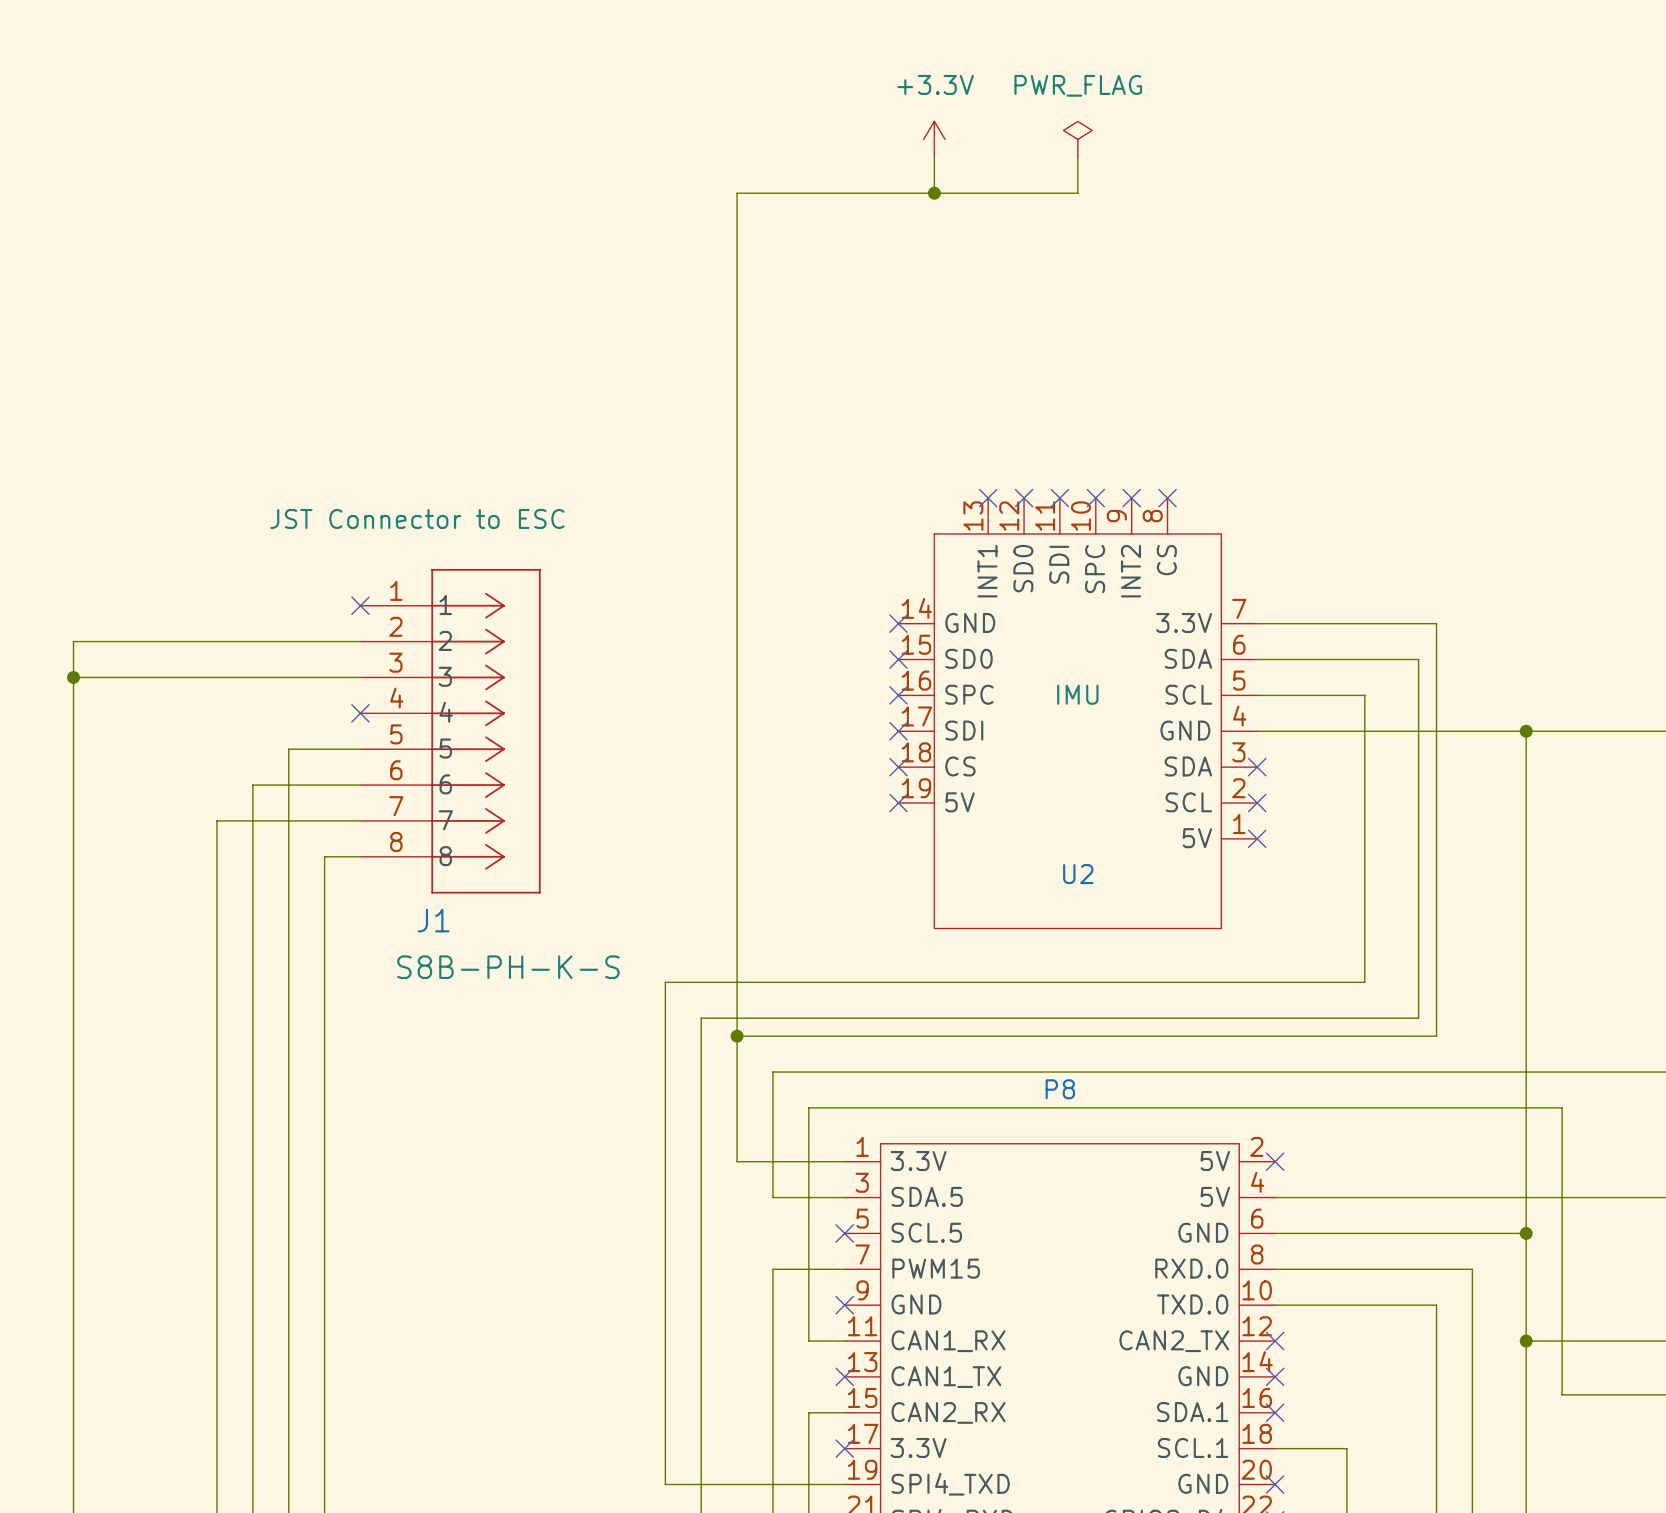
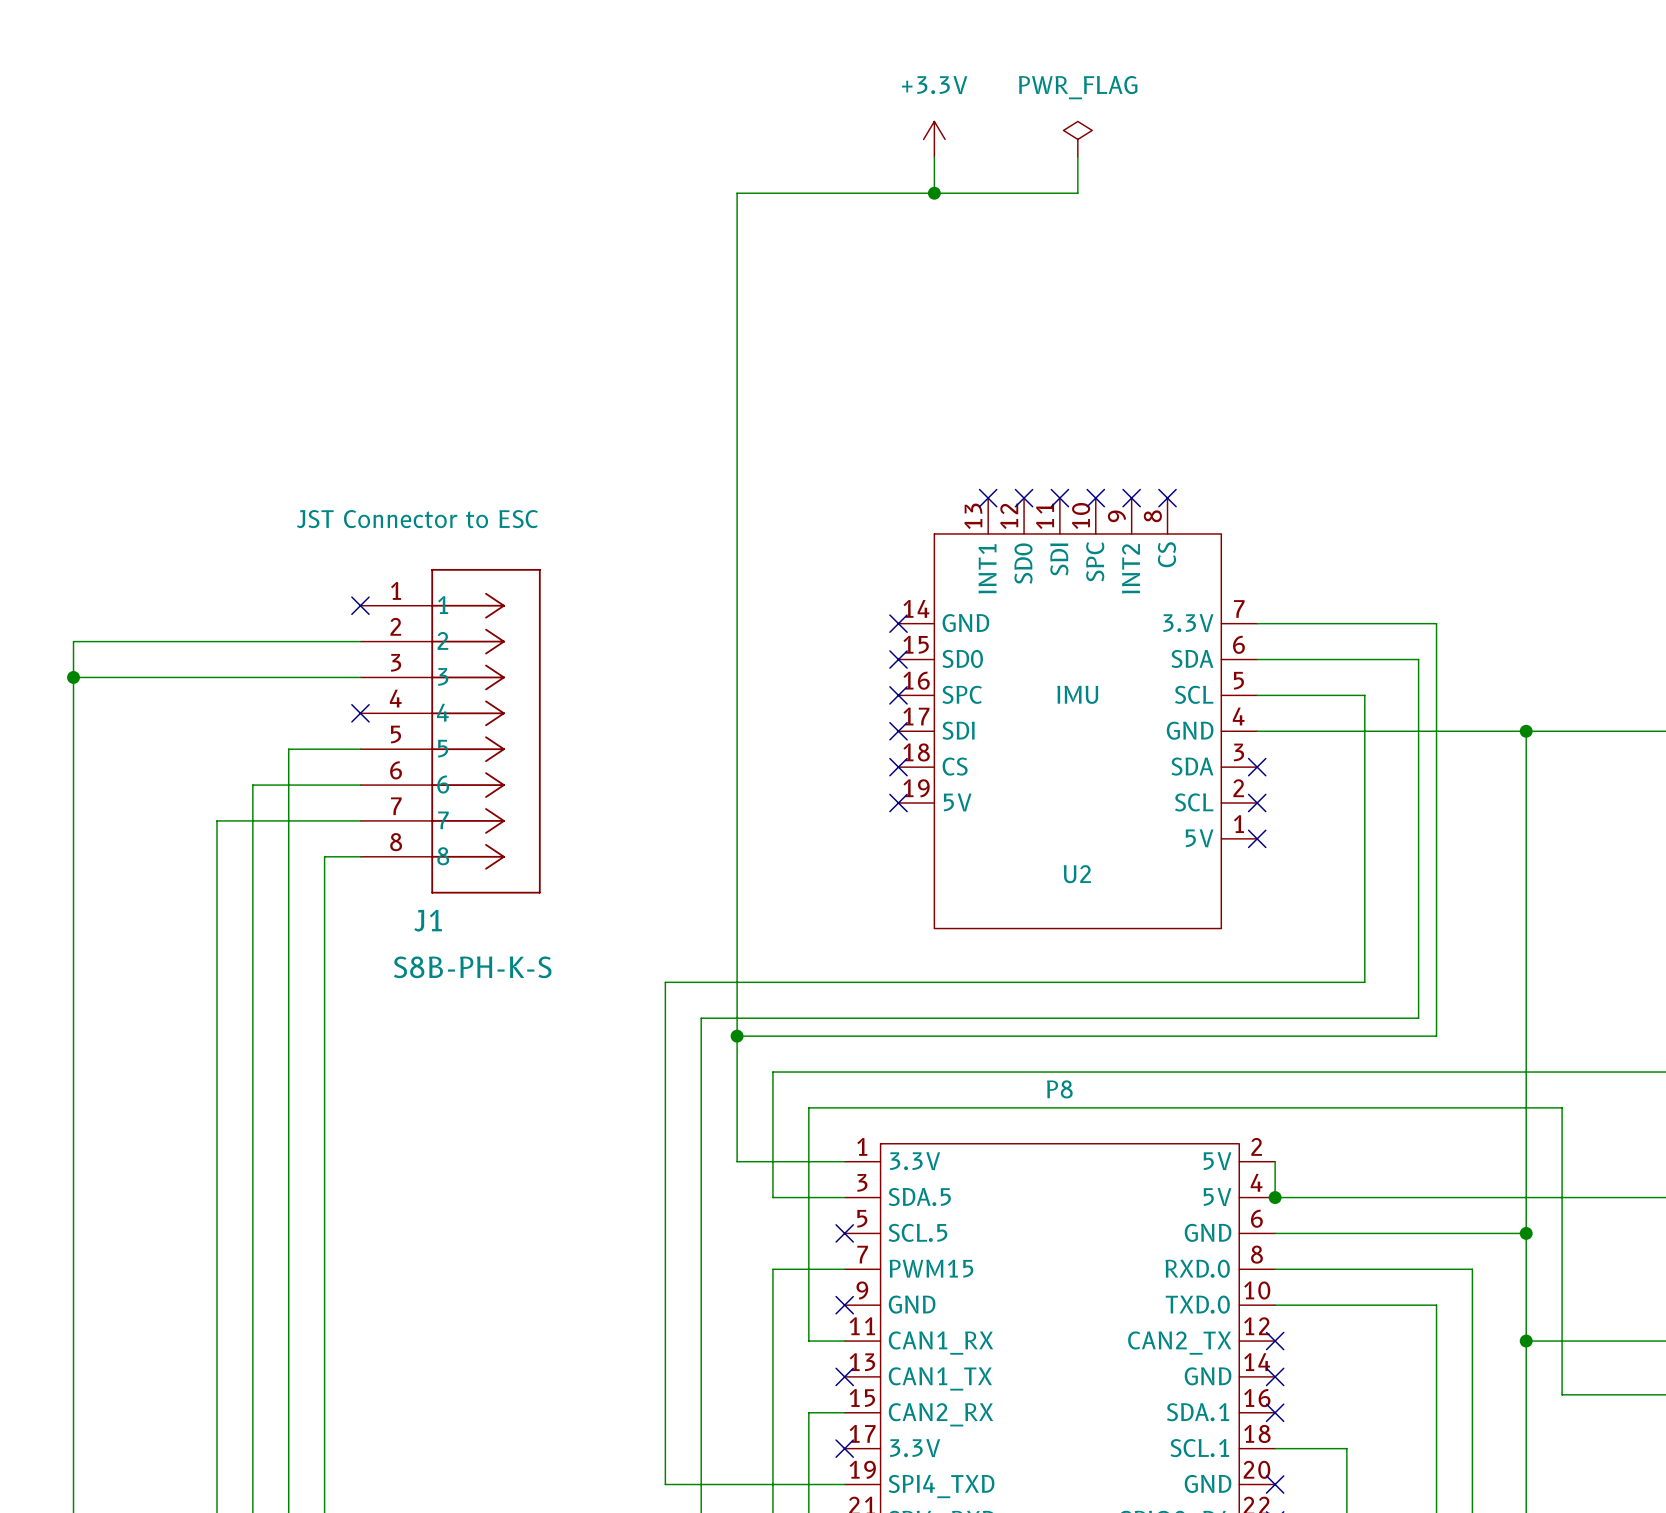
wire: none -> (1275, 1161) (1275, 1197)
no-connect mark: (1275, 1161) -> none
junction: none -> (1275, 1197)

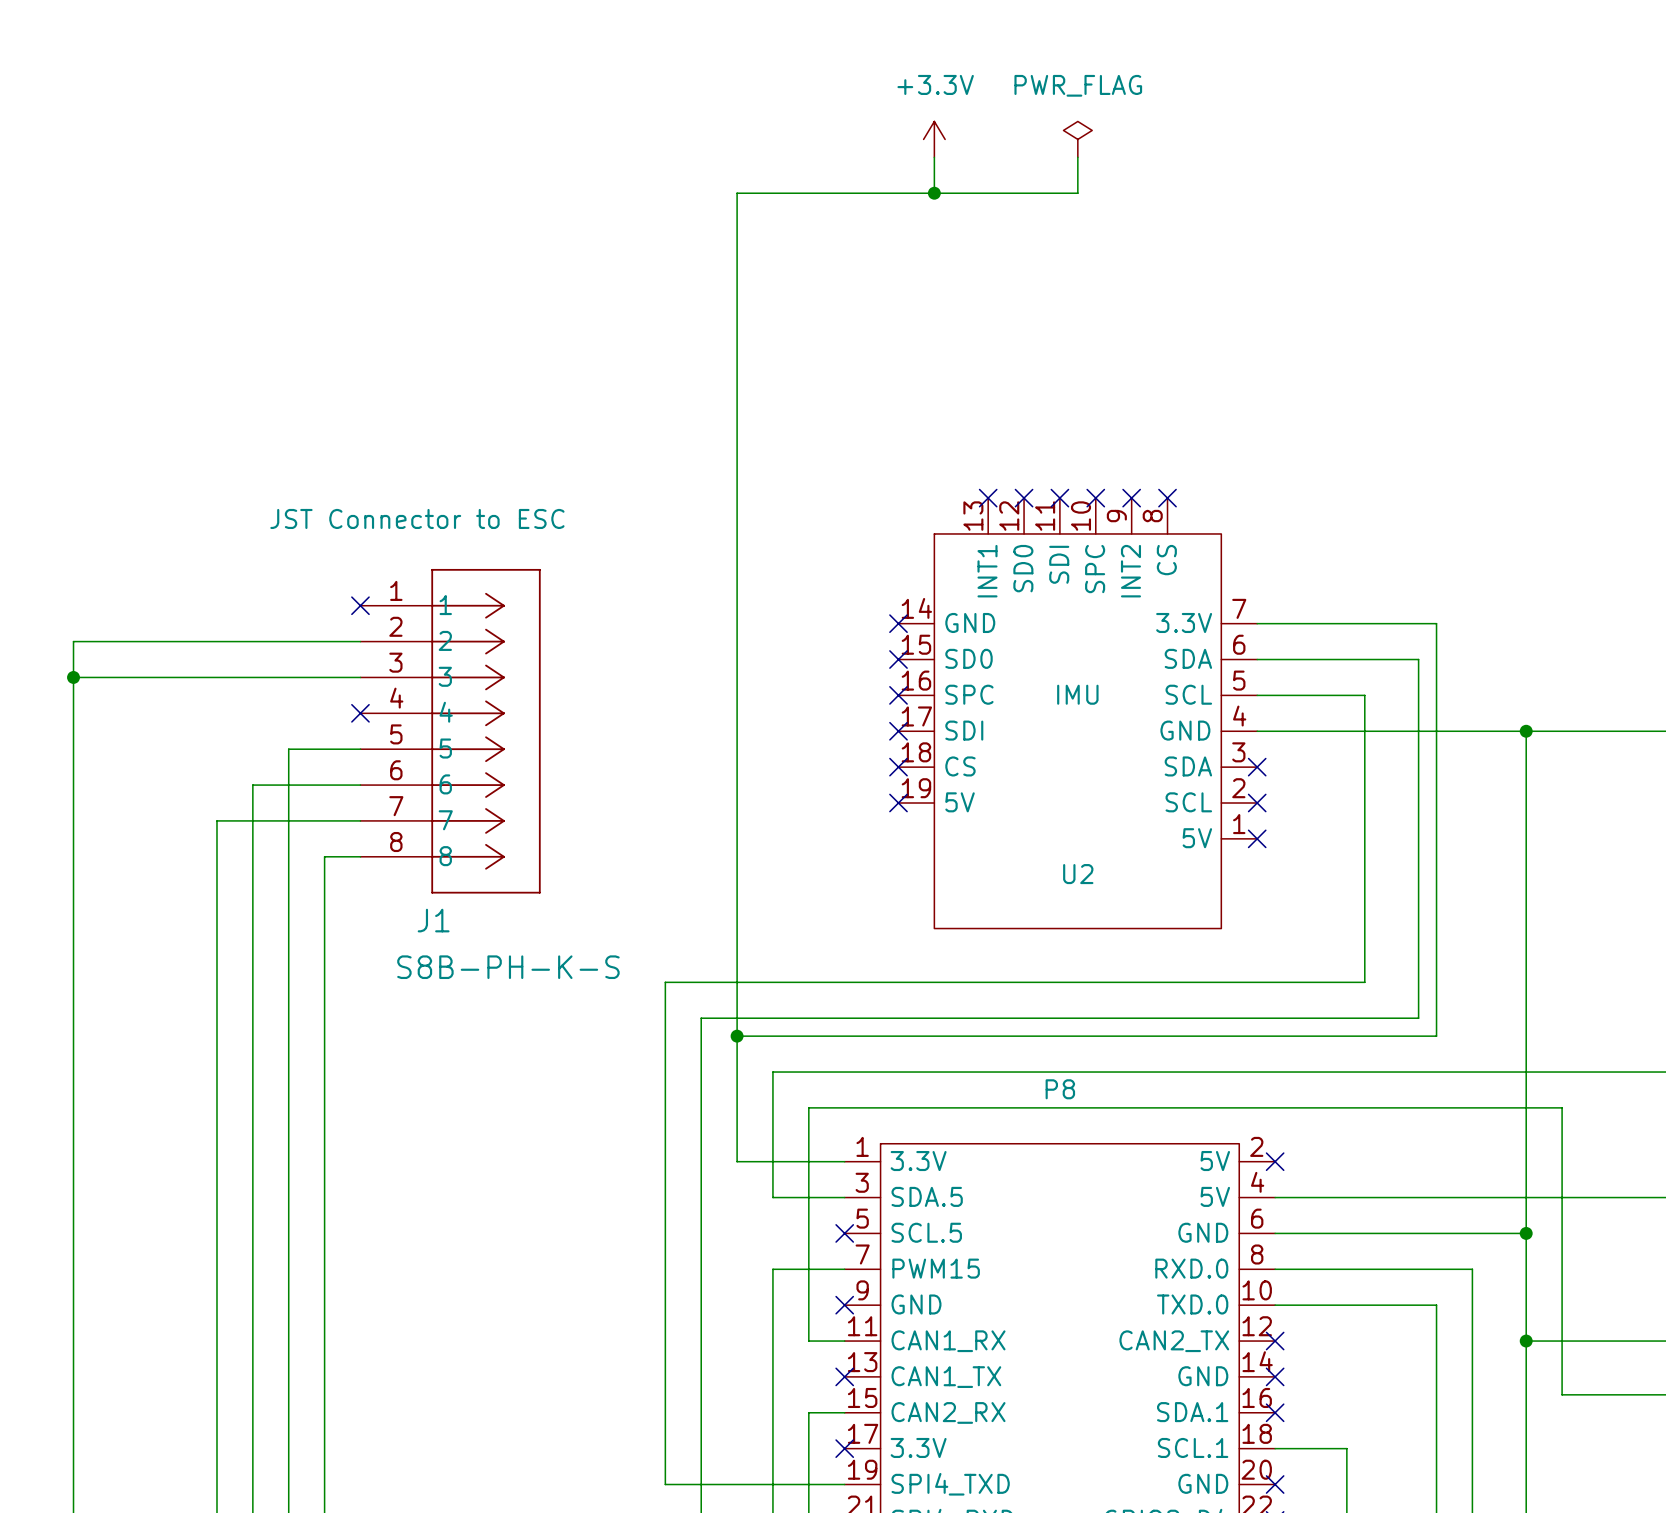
wire: (1275, 1161) (1275, 1197) -> none
no-connect mark: none -> (1275, 1161)
junction: (1275, 1197) -> none

